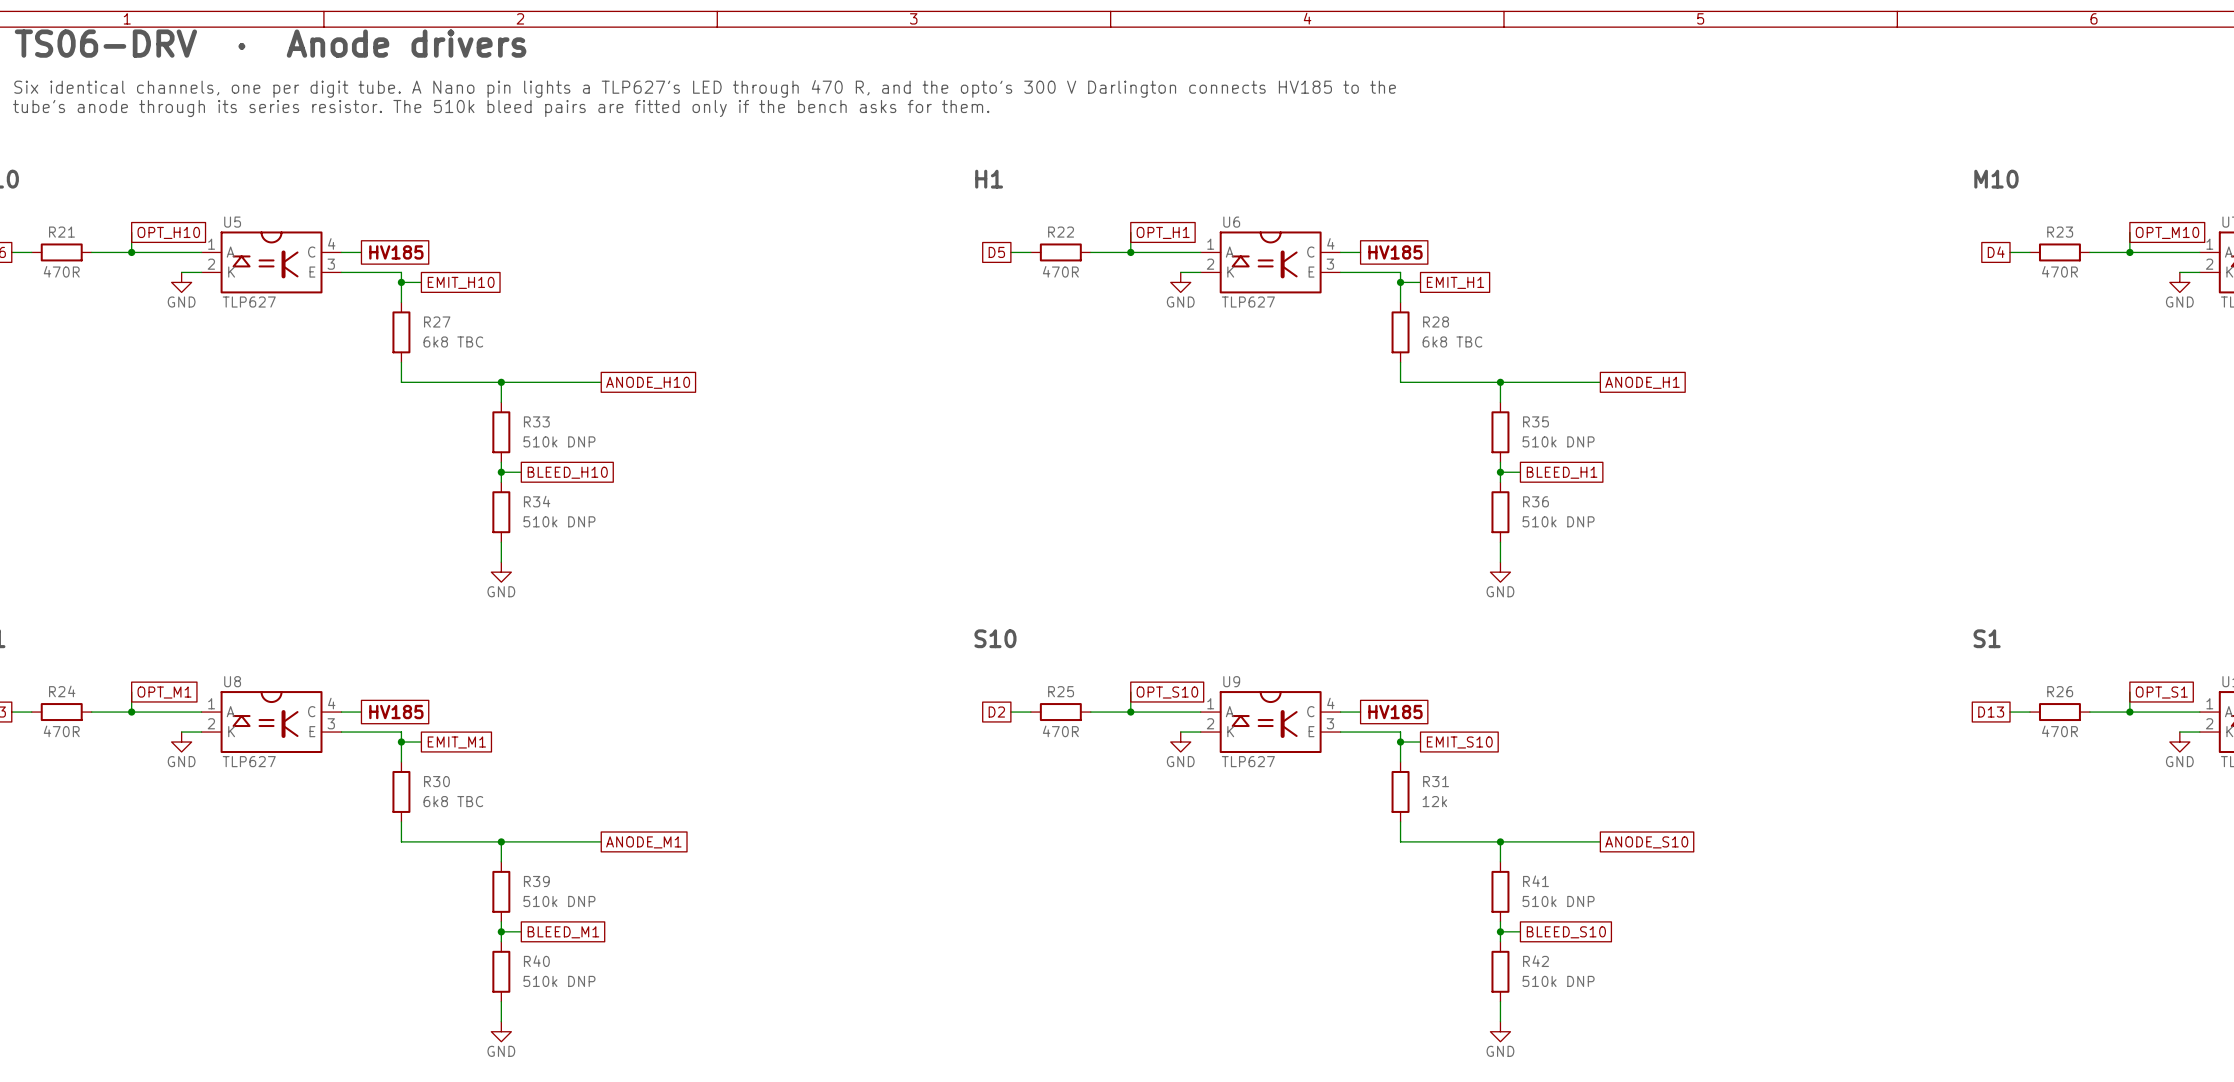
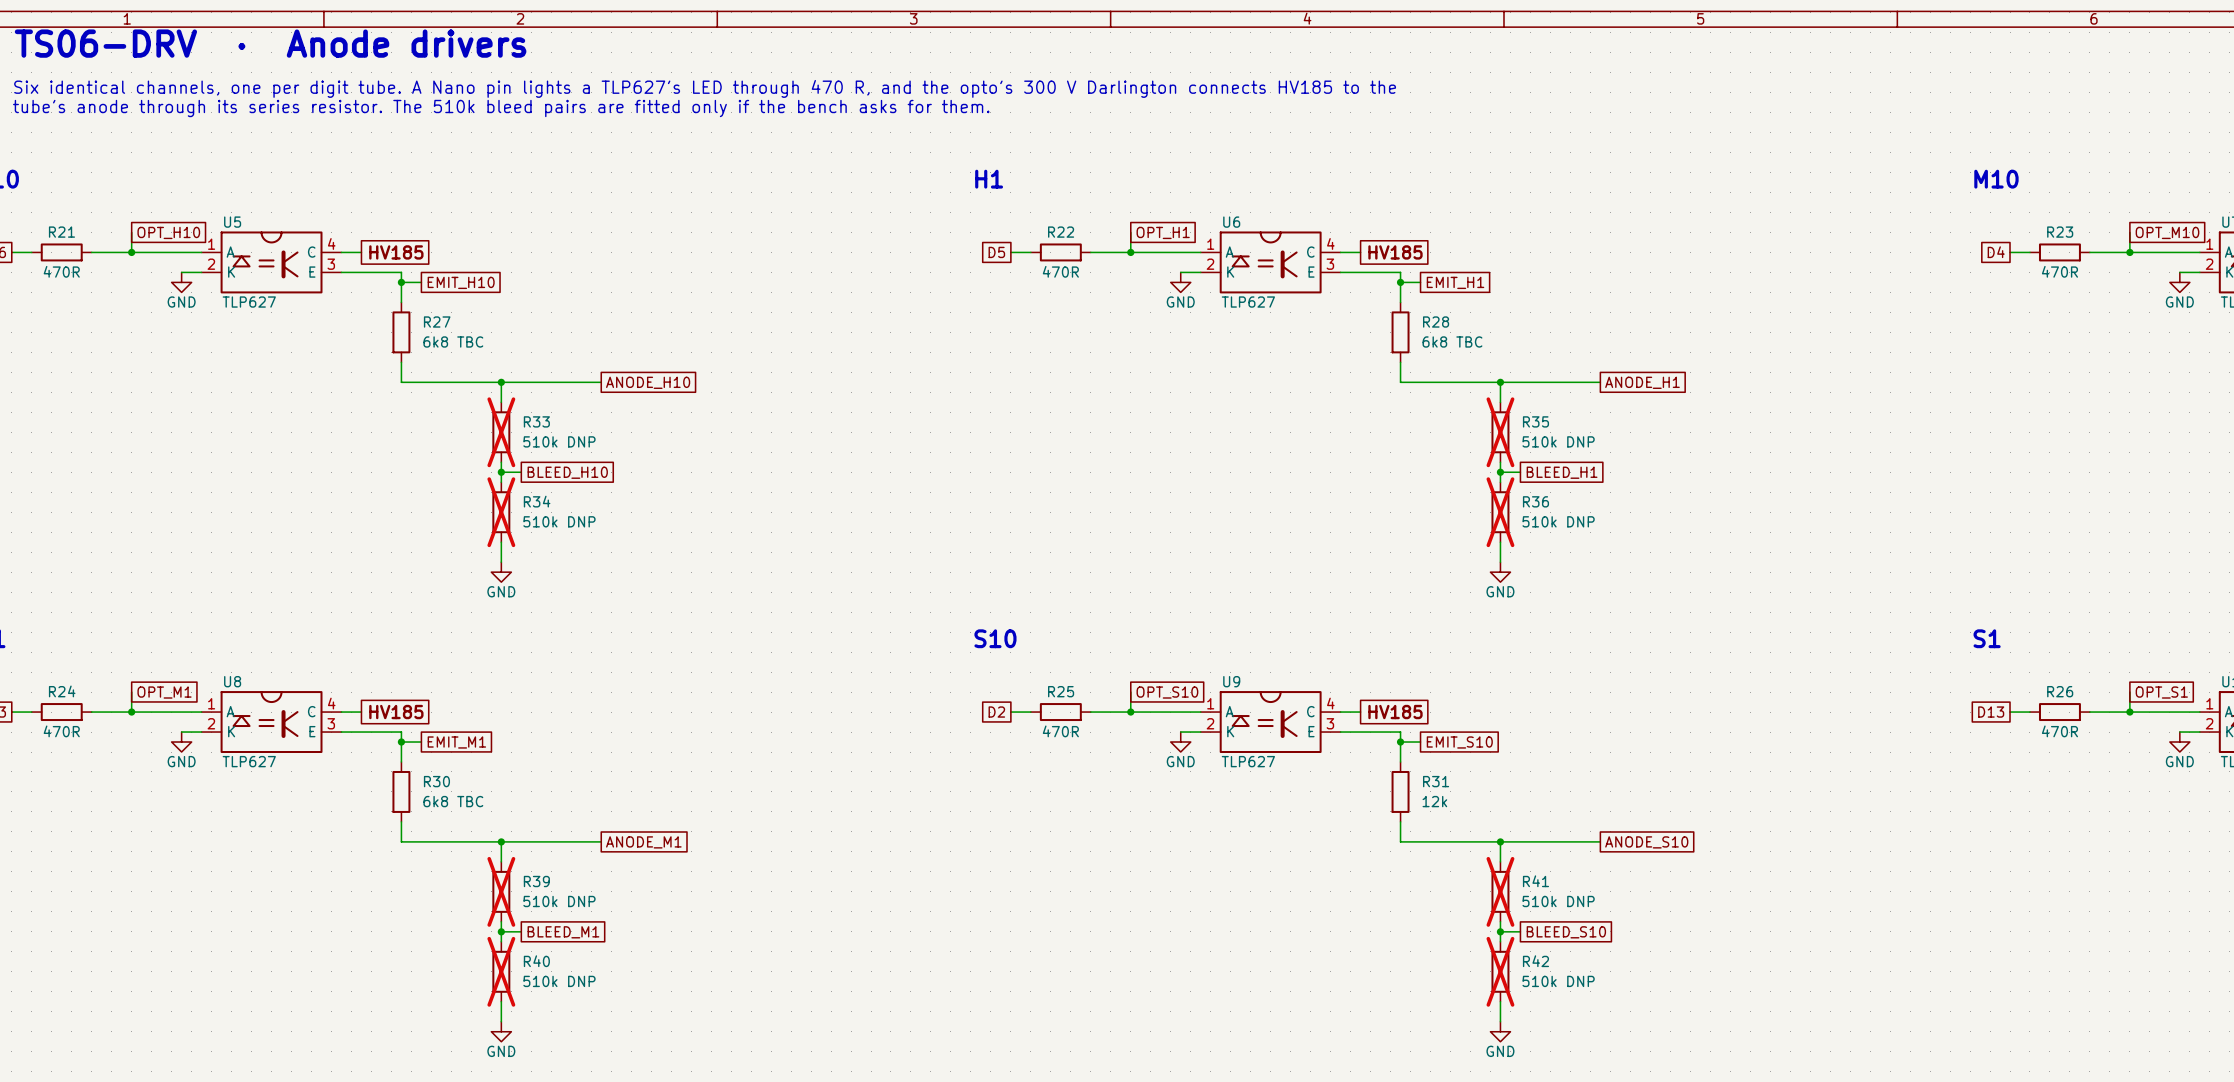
R33 do-not-place cross: none -> (501, 432)
R35 do-not-place cross: none -> (1500, 432)
R34 do-not-place cross: none -> (501, 512)
R36 do-not-place cross: none -> (1500, 512)
R39 do-not-place cross: none -> (501, 891)
R41 do-not-place cross: none -> (1500, 891)
R40 do-not-place cross: none -> (501, 971)
R42 do-not-place cross: none -> (1500, 971)

